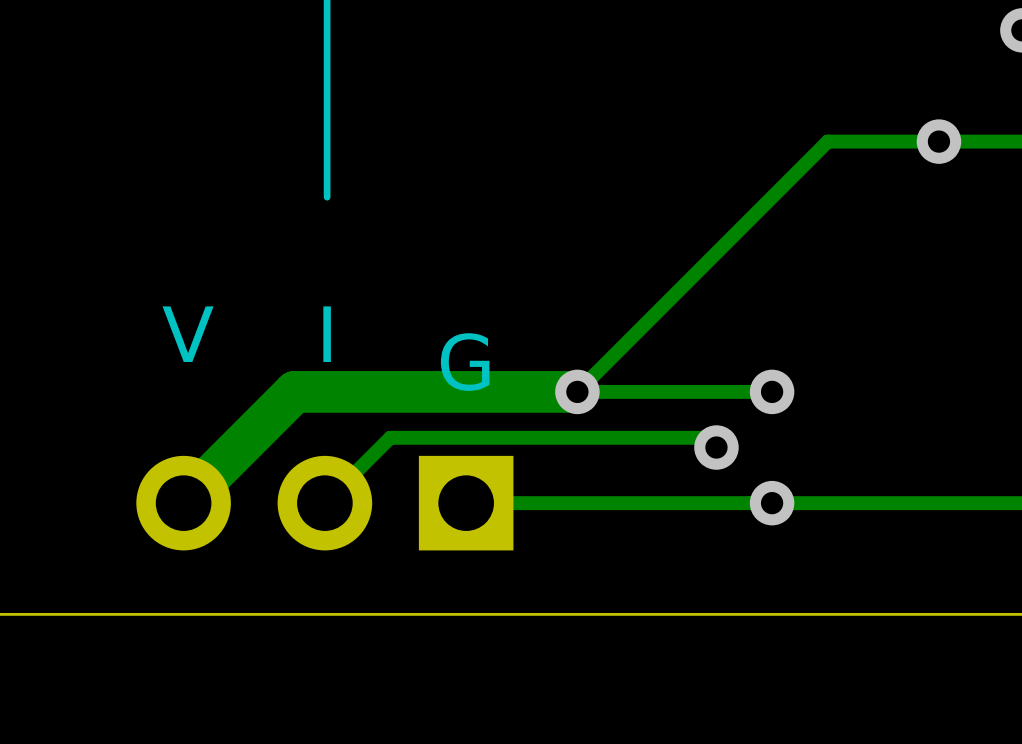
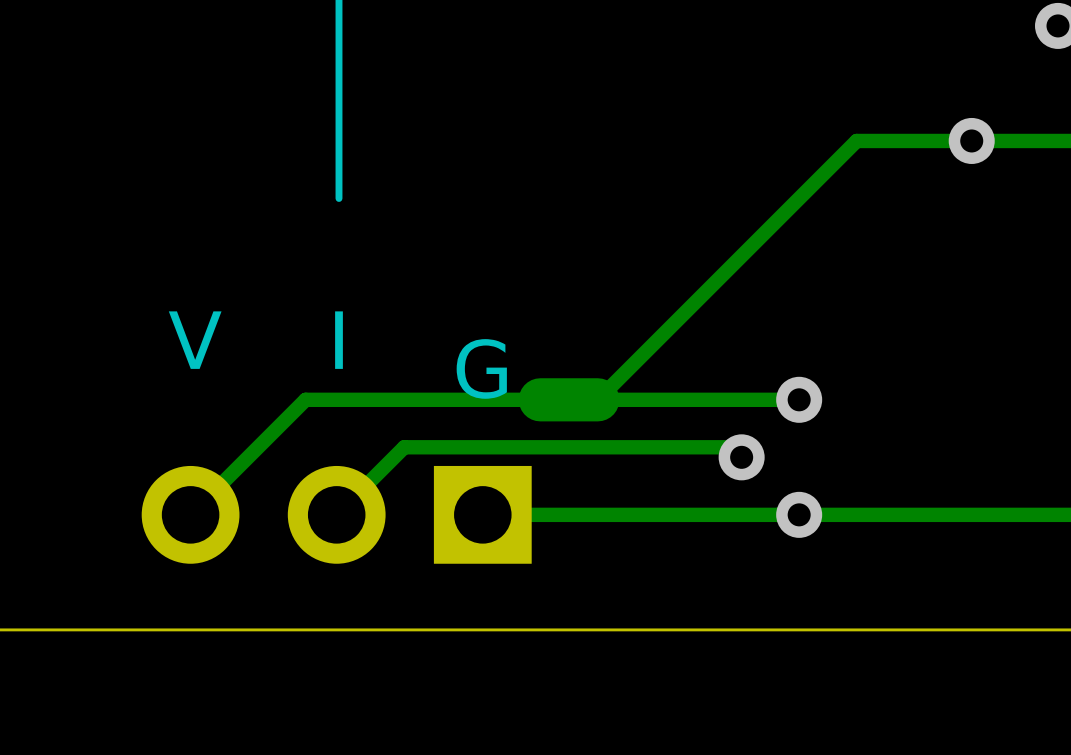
track width: thick (521, 391) (294, 391) (183, 503) -> thin (540, 399) (305, 399) (190, 514)
via: (577, 391) -> none

